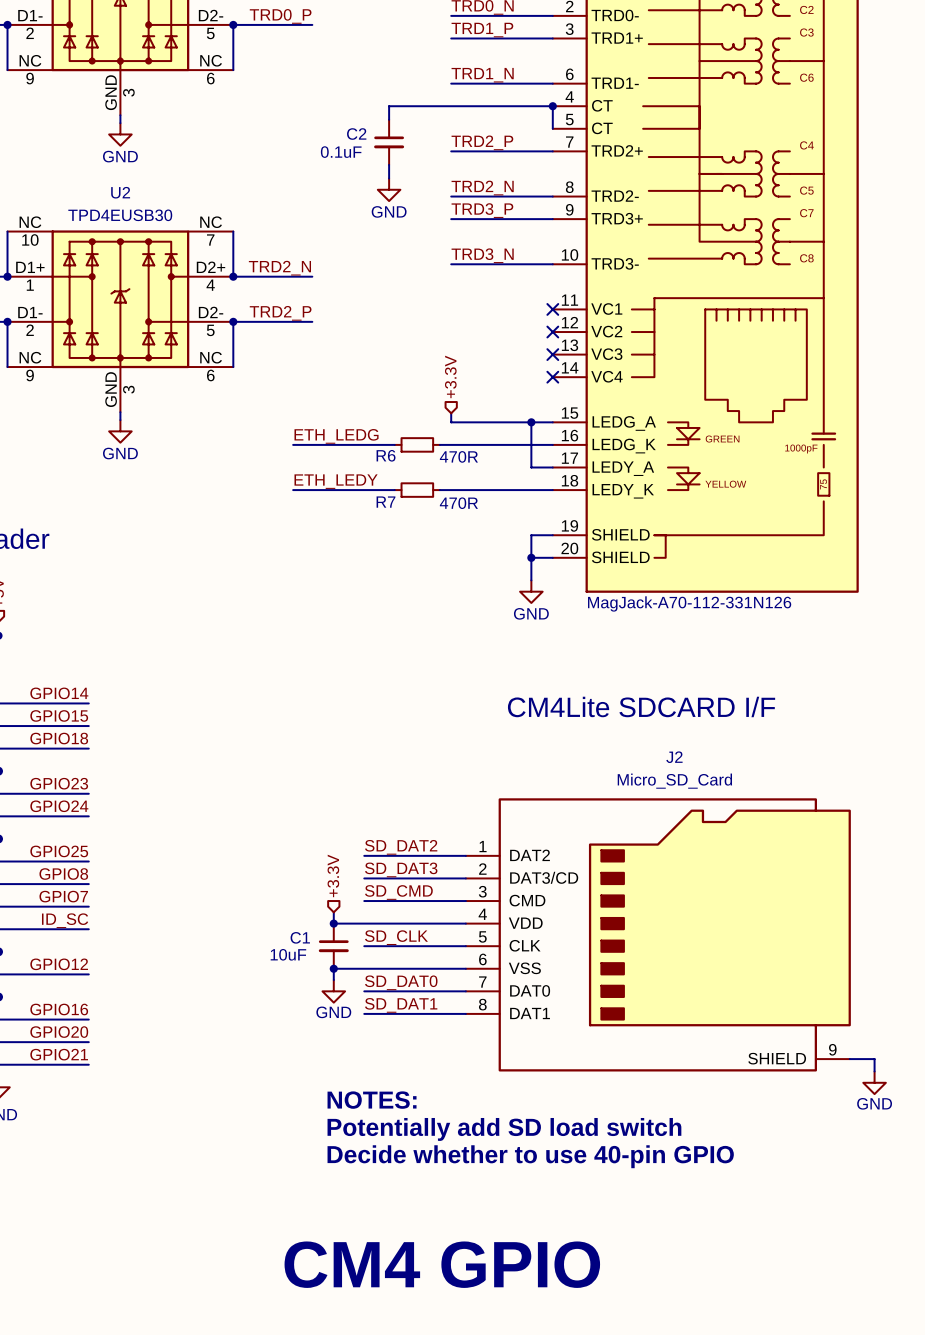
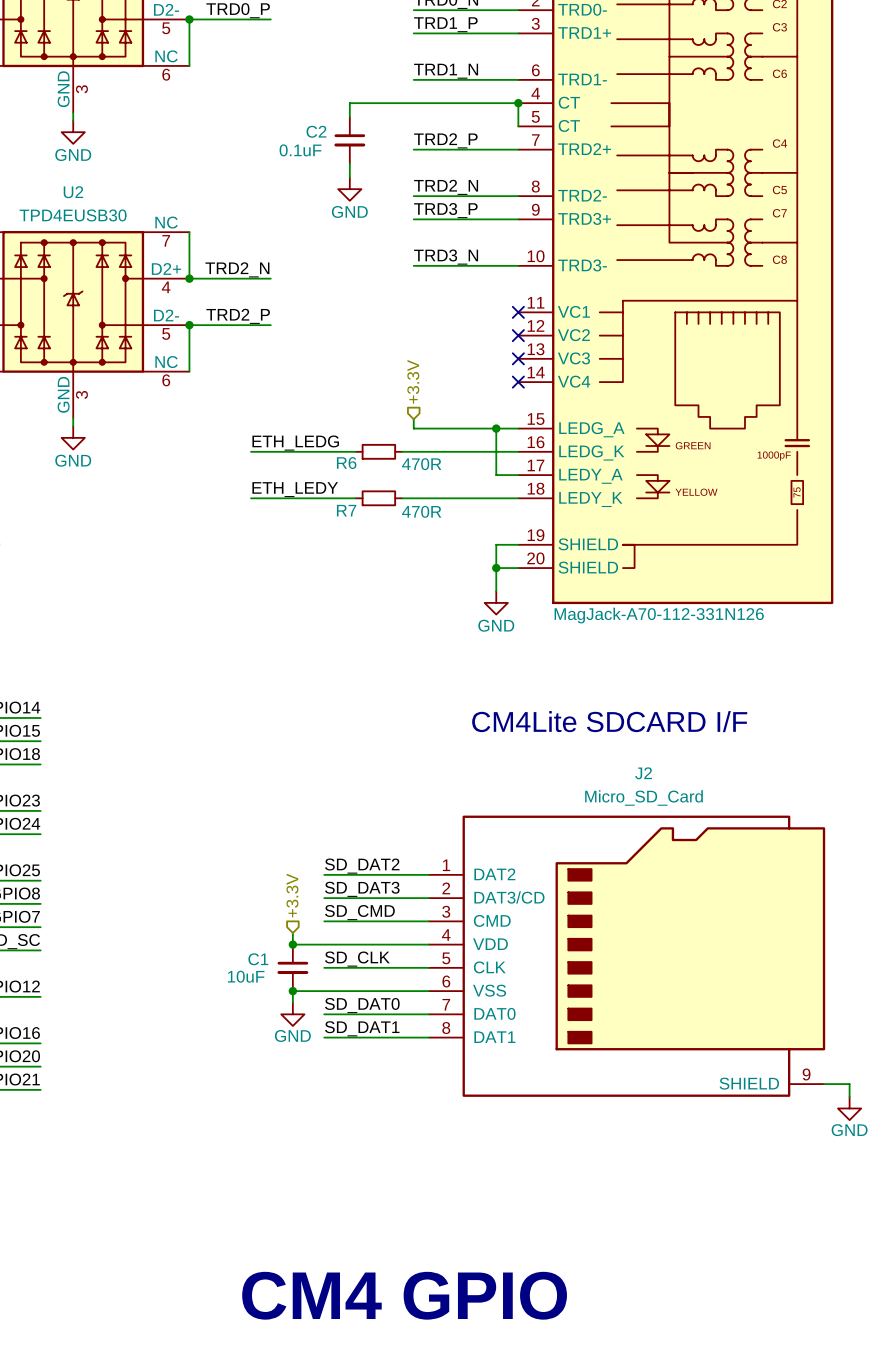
text: NOTES: (372, 1100) -> none
text: Potentially add SD load switch (504, 1129) -> none
text: Decide whether to use 40-pin GPIO (530, 1156) -> none

